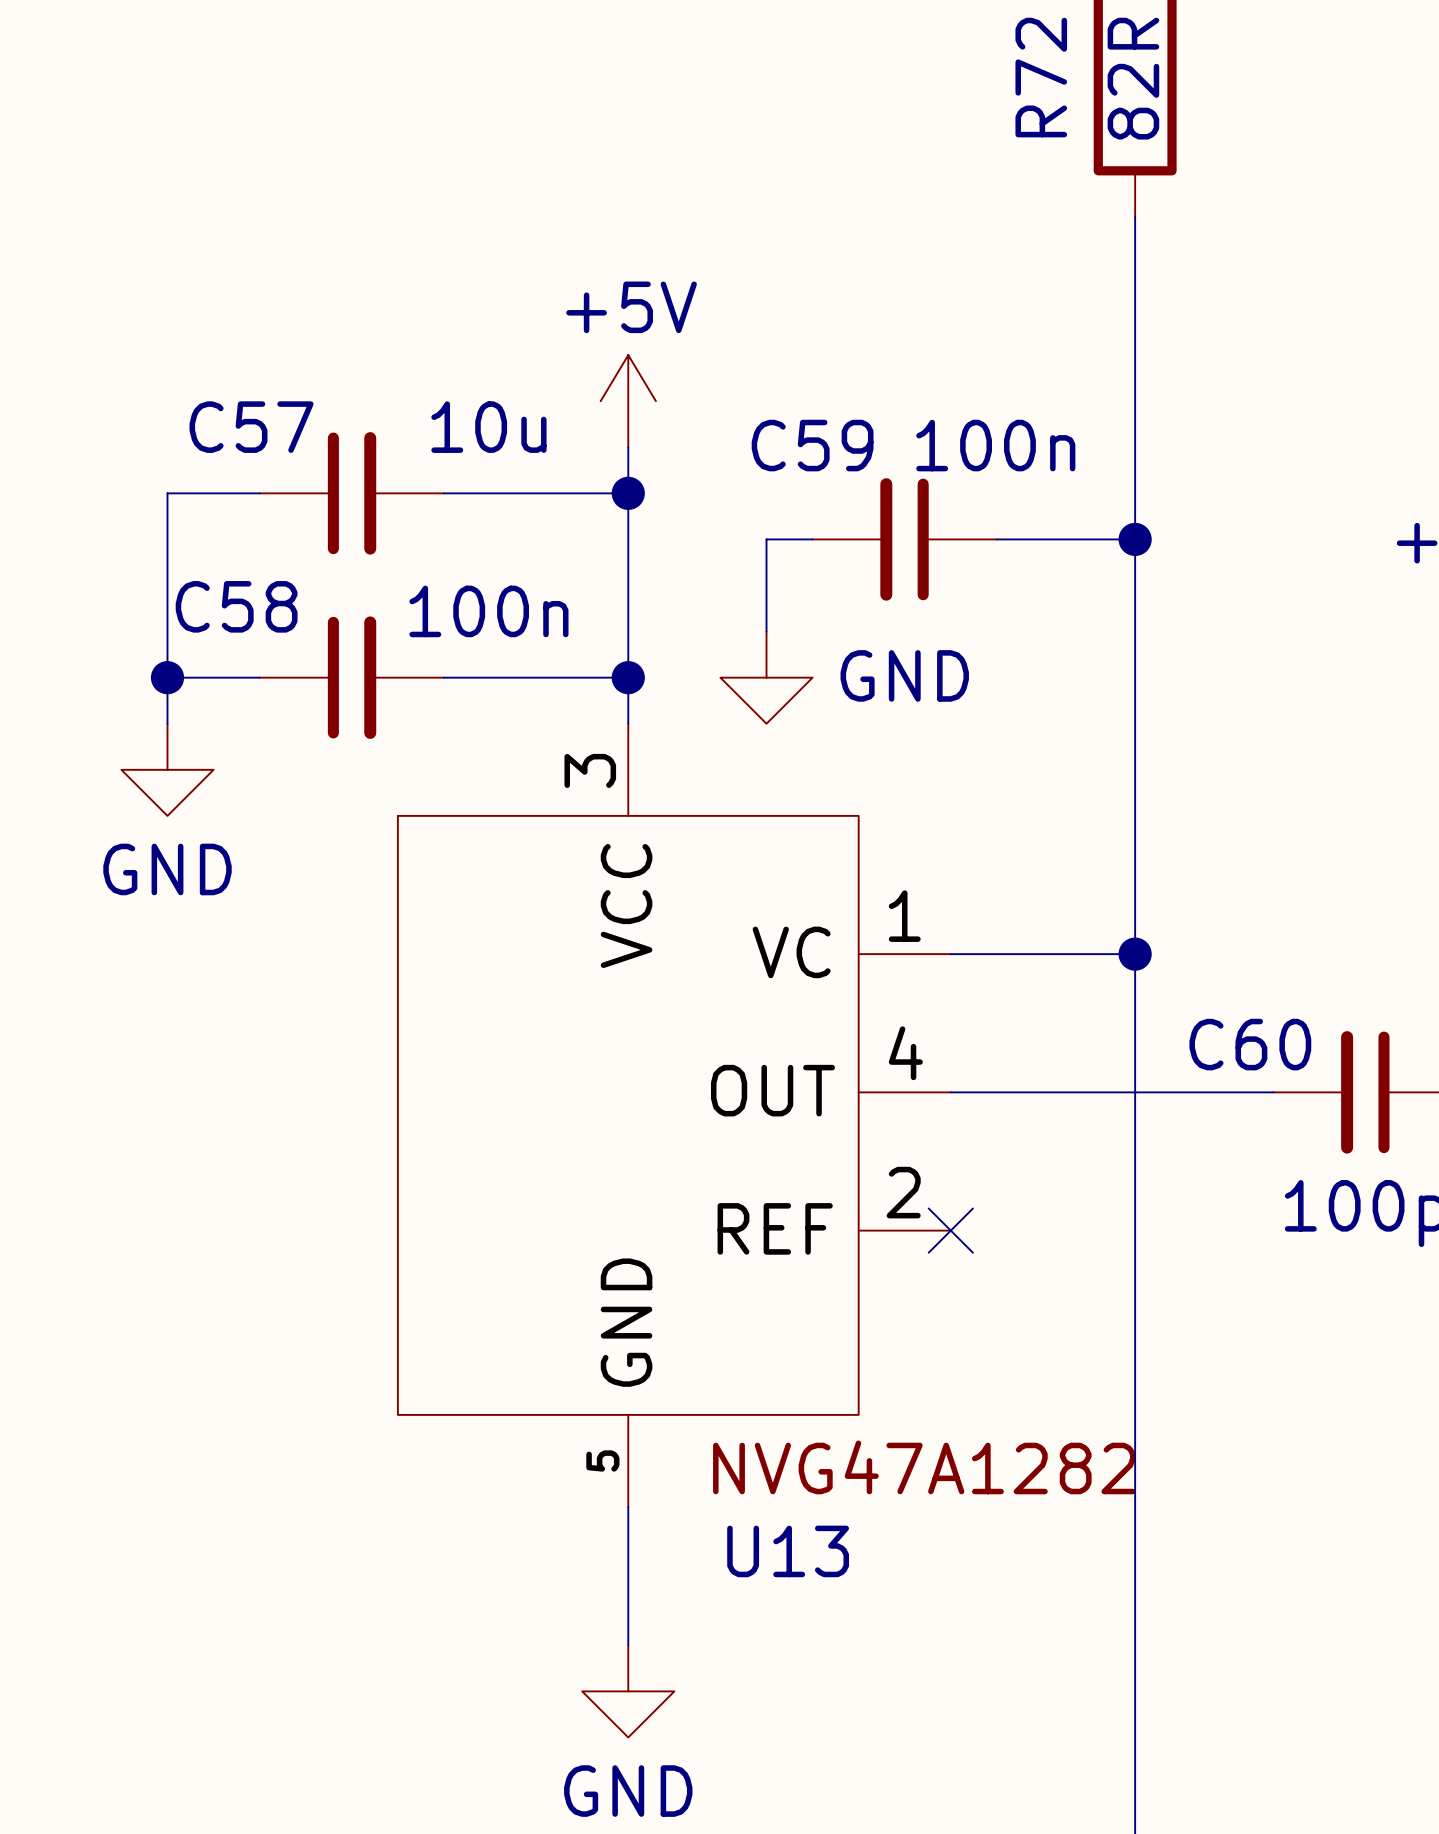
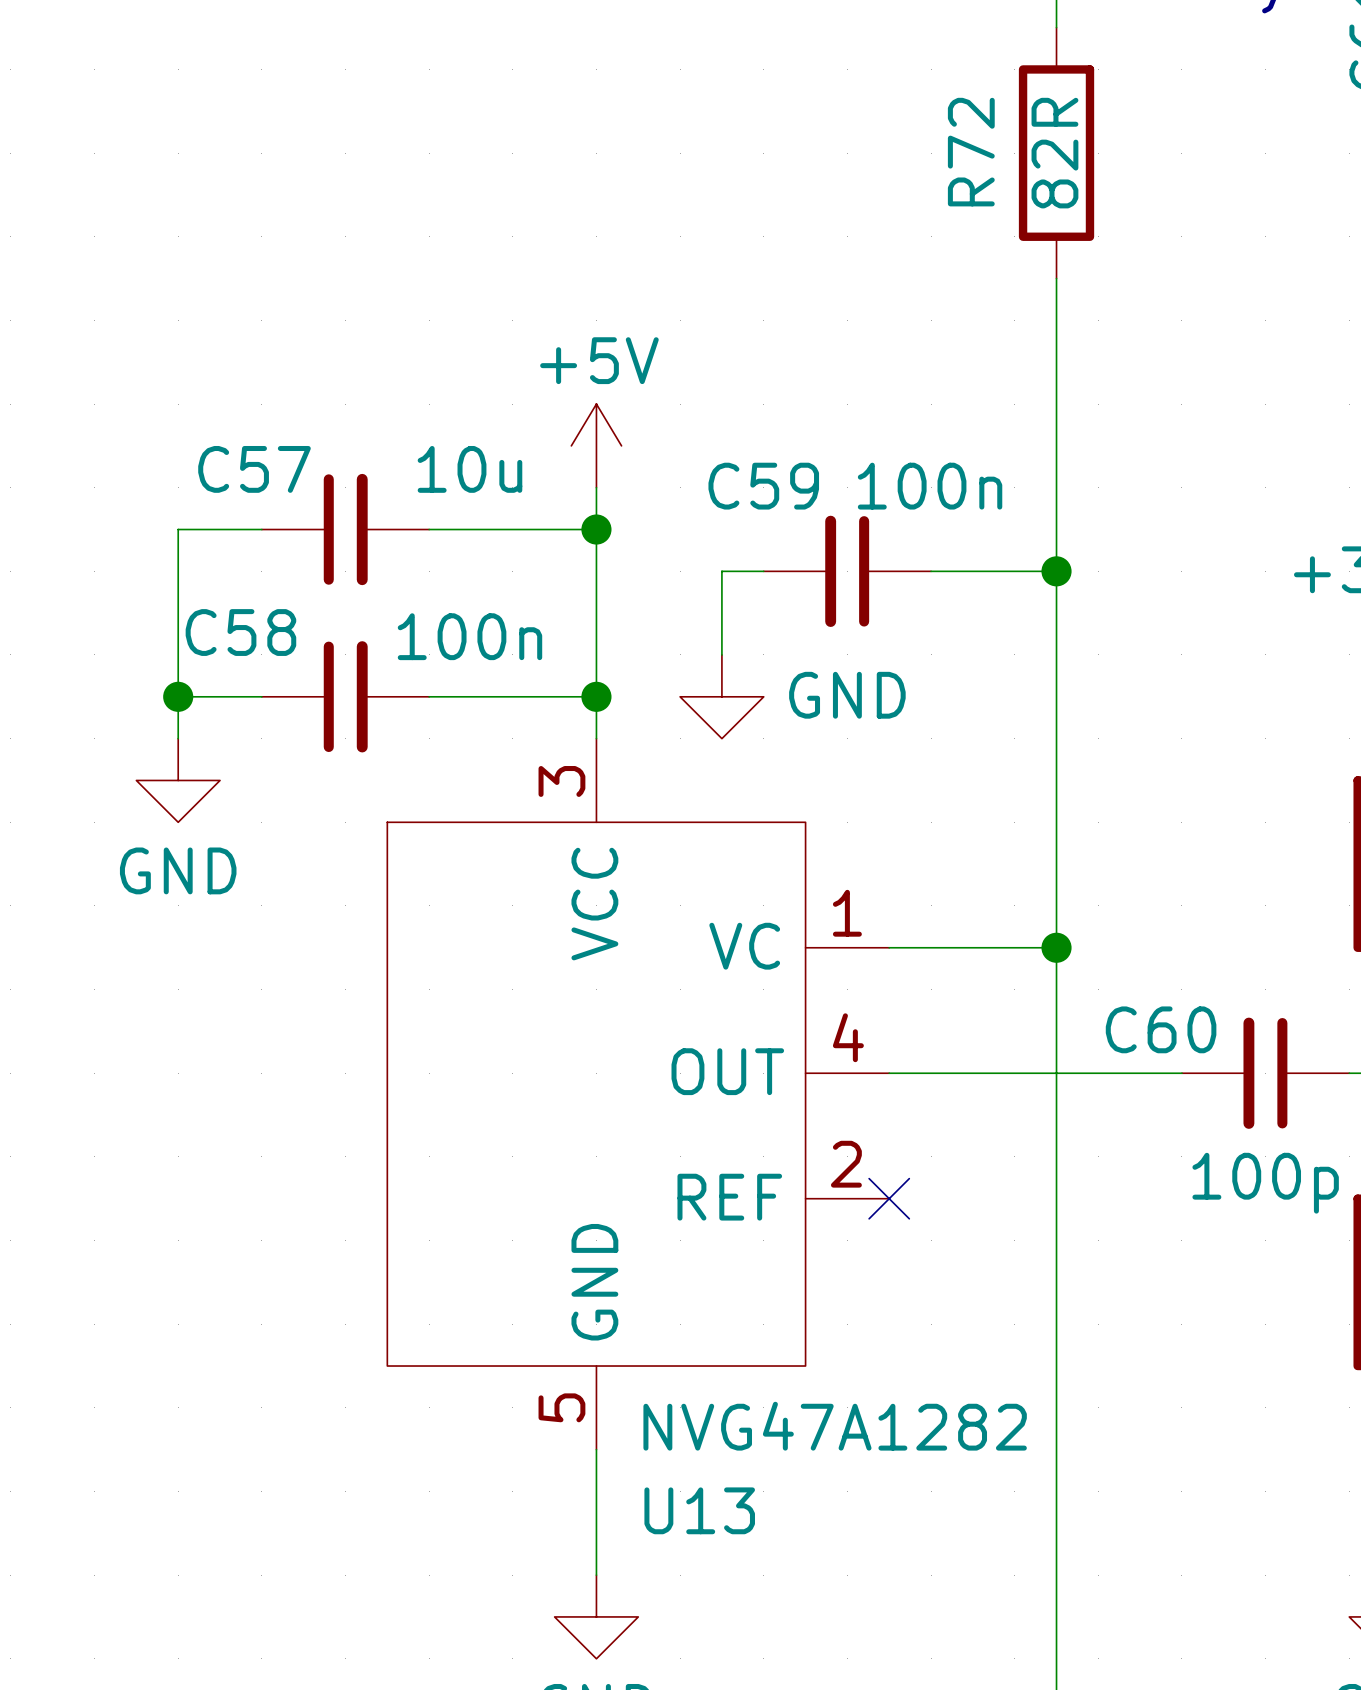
U13 symbol: [397, 723, 951, 1508] -> [387, 738, 890, 1450]
U13 value: none -> NVG47A1282 (835, 1426)

